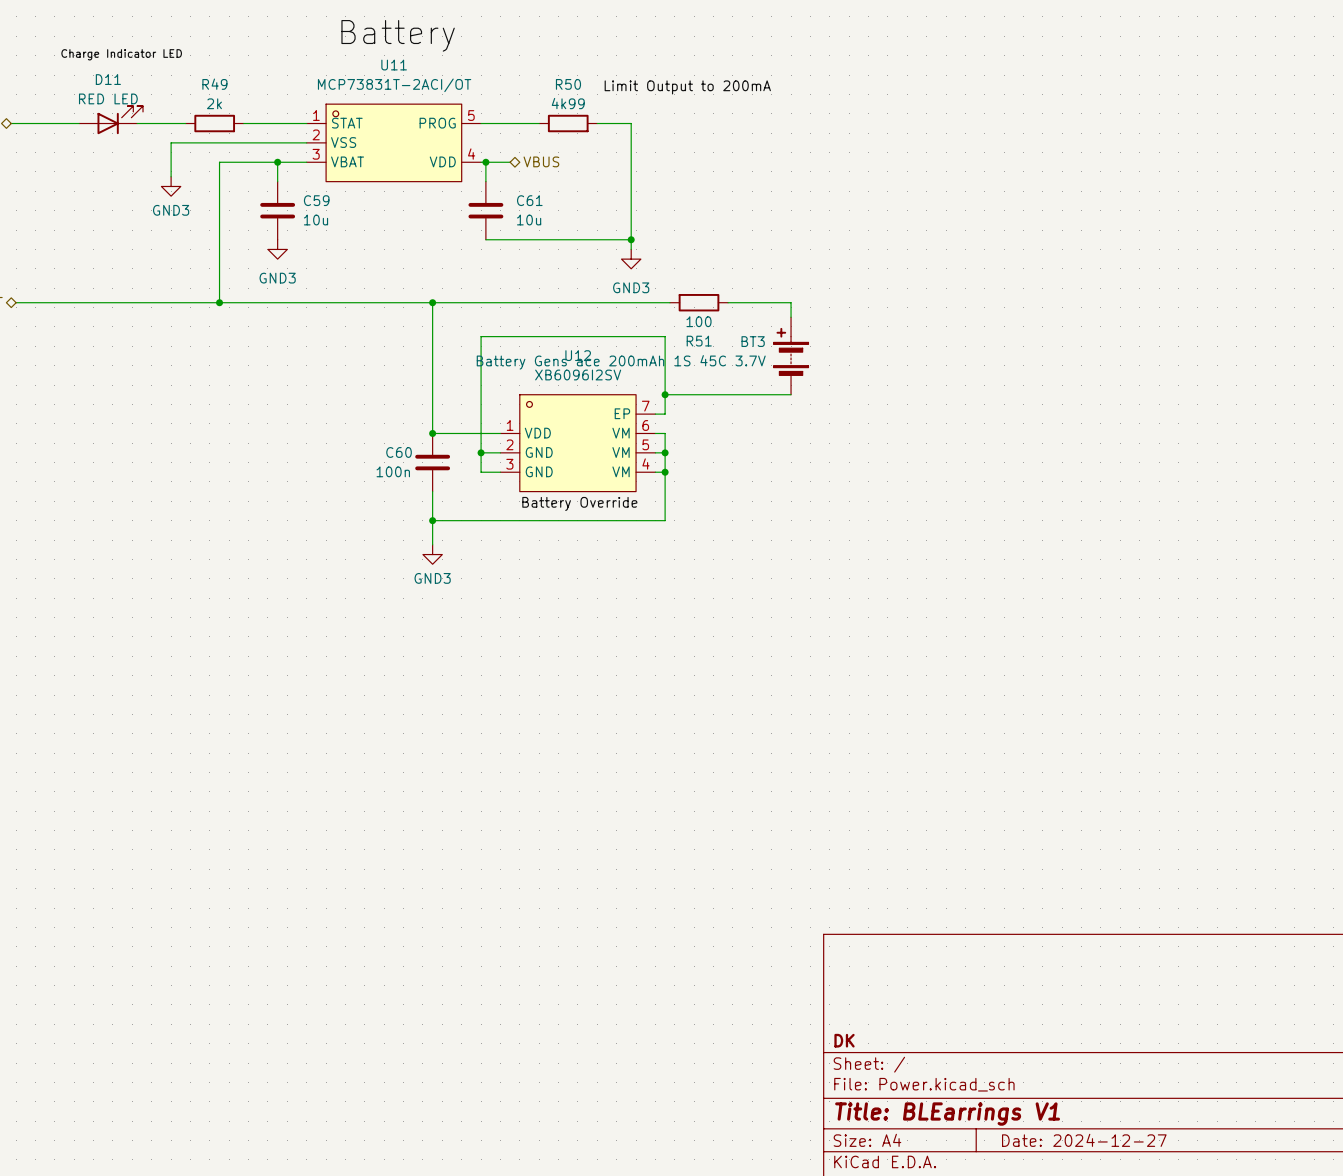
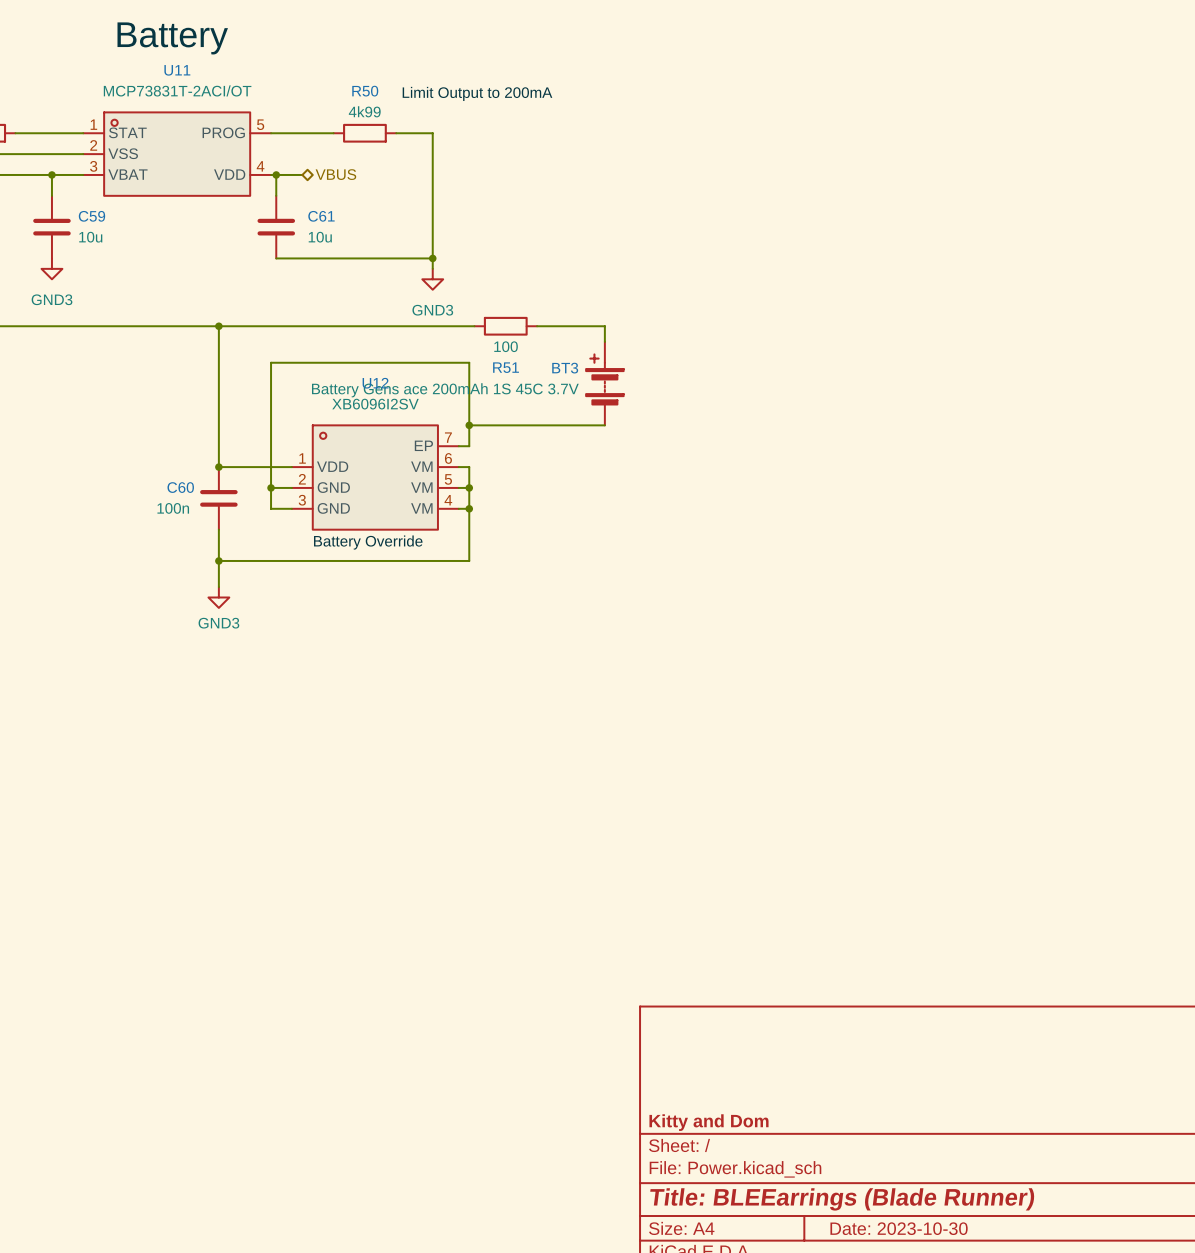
title block: DK (844, 1040) -> Kitty and Dom (708, 1122)
title block: Title: BLEarrings V1 (947, 1114) -> Title: BLEEarrings (Blade Runner) (842, 1199)
title block: Date: 2024-12-27 (1084, 1140) -> Date: 2023-10-30 (899, 1228)

